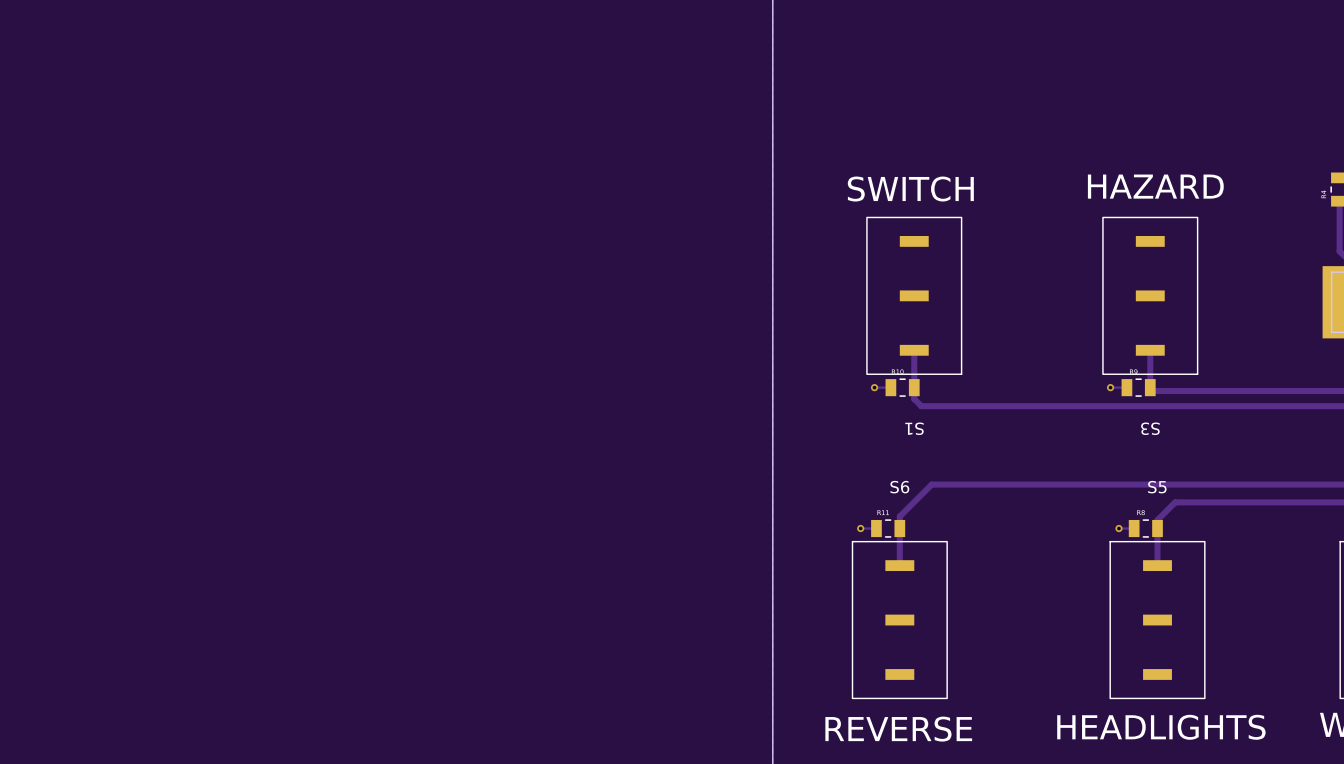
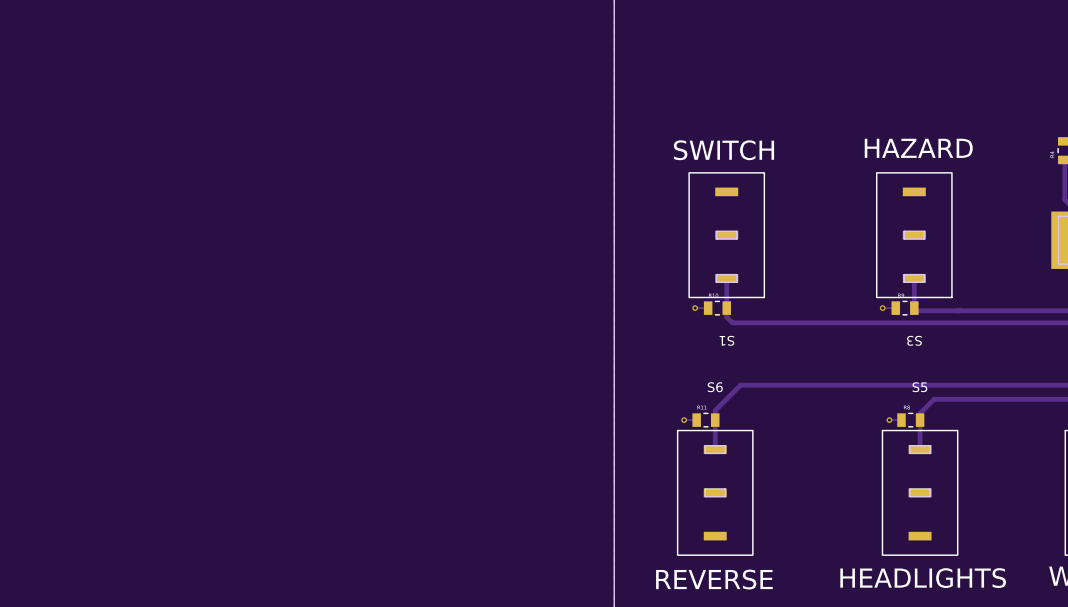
board edge: none -> (716, 231) (716, 239) (736, 239) (736, 231) (716, 231)
board edge: none -> (904, 231) (904, 239) (924, 239) (924, 231) (904, 231)
board edge: none -> (716, 274) (736, 274) (736, 282) (716, 282) (716, 274)
board edge: none -> (904, 274) (924, 274) (924, 282) (904, 282) (904, 274)
board edge: none -> (705, 445) (725, 445) (725, 453) (705, 453) (705, 445)
board edge: none -> (910, 445) (930, 445) (930, 453) (910, 453) (910, 445)
board edge: none -> (705, 489) (705, 496) (725, 496) (725, 489) (705, 489)
board edge: none -> (910, 489) (930, 489) (930, 496) (910, 496) (910, 489)

